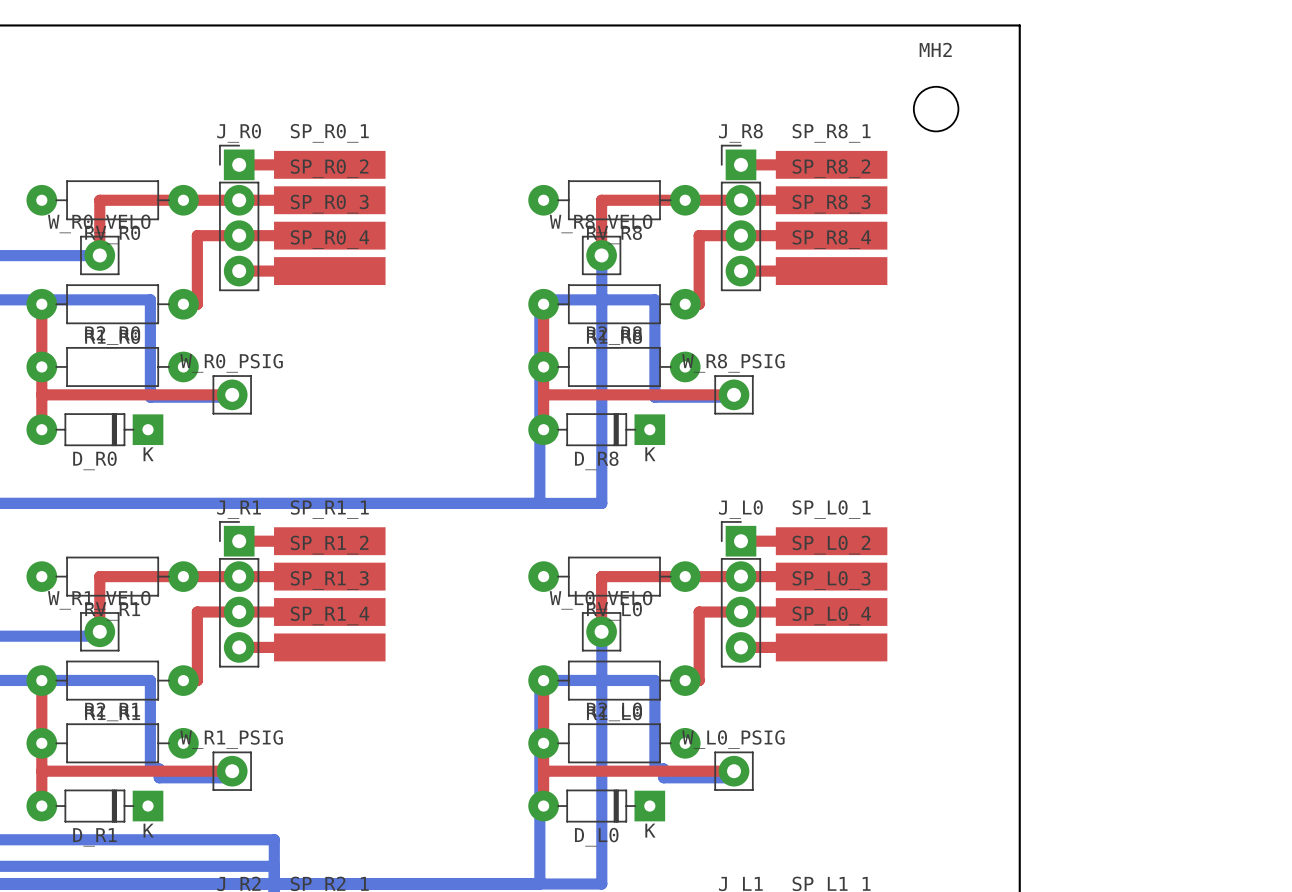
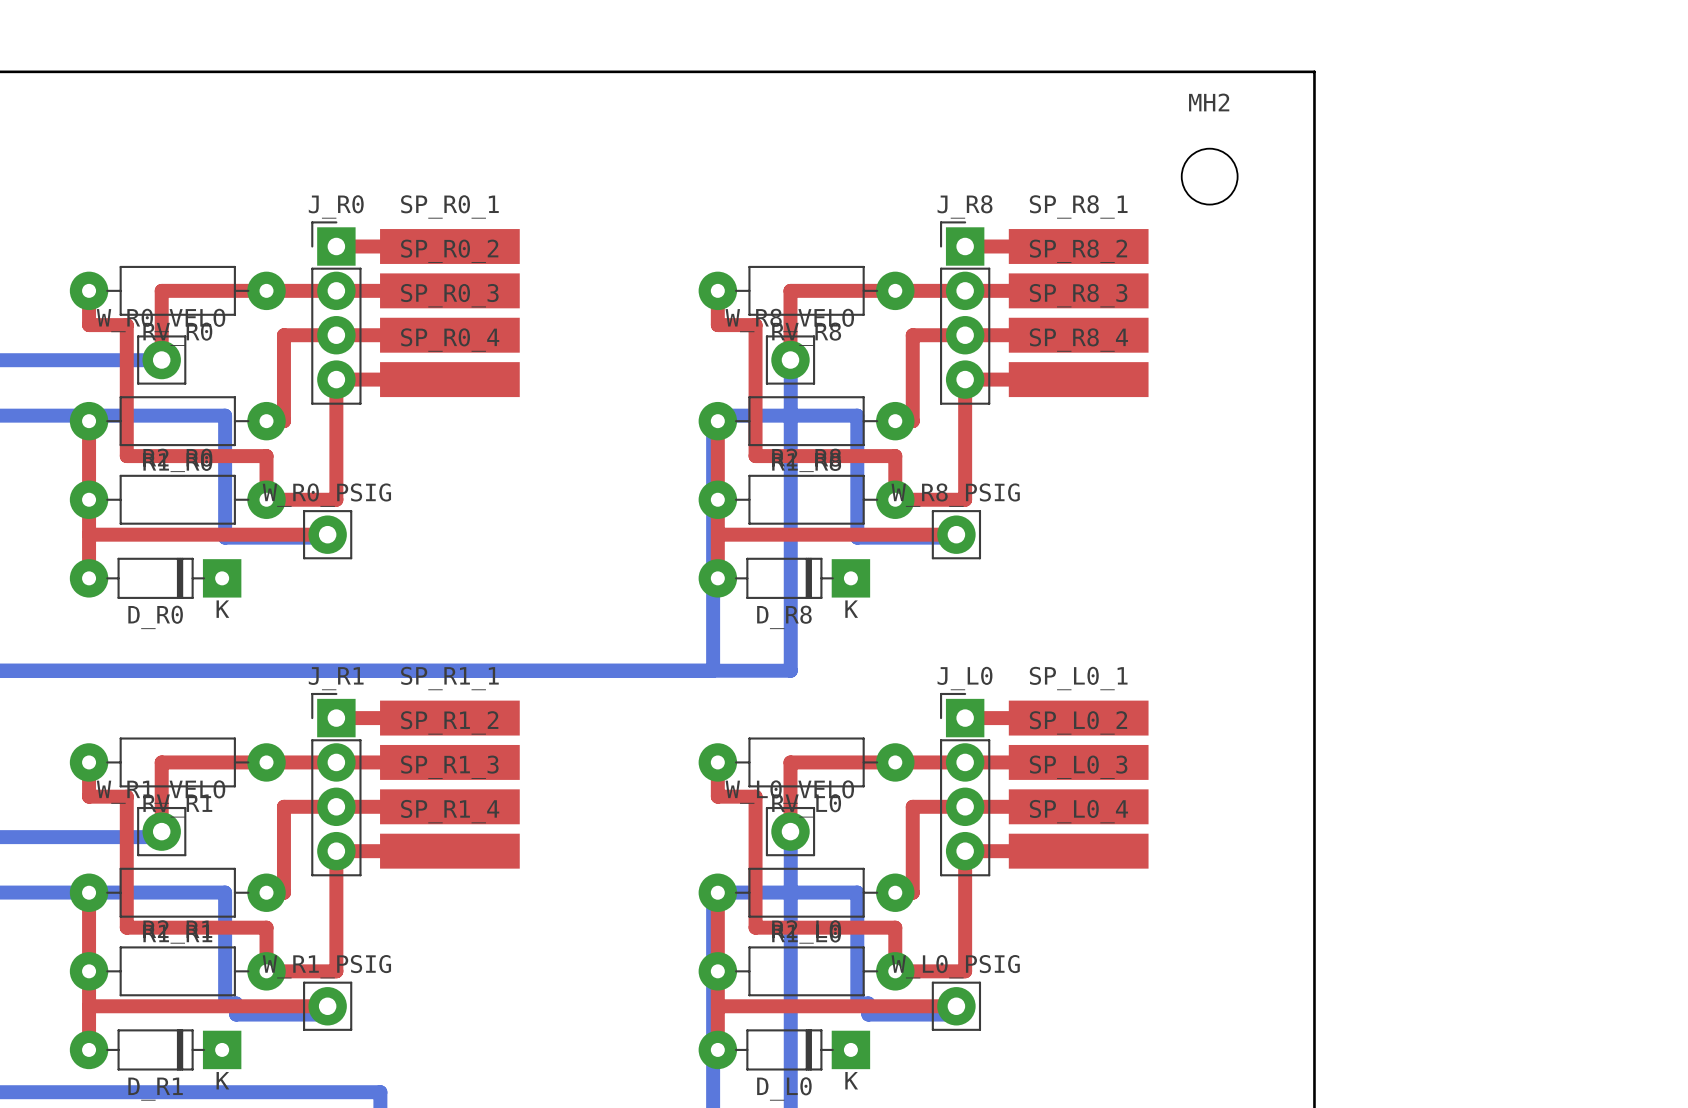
top track: none -> (89, 290) (89, 325) (126, 325) (126, 456) (266, 456) (266, 499) (336, 499) (336, 379)
top track: none -> (717, 290) (717, 325) (755, 325) (755, 456) (895, 456) (895, 499) (965, 499) (965, 379)
top track: none -> (89, 762) (89, 796) (126, 796) (126, 927) (266, 927) (266, 971) (336, 971) (336, 851)
top track: none -> (717, 762) (717, 796) (755, 796) (755, 927) (895, 927) (895, 971) (965, 971) (965, 851)

